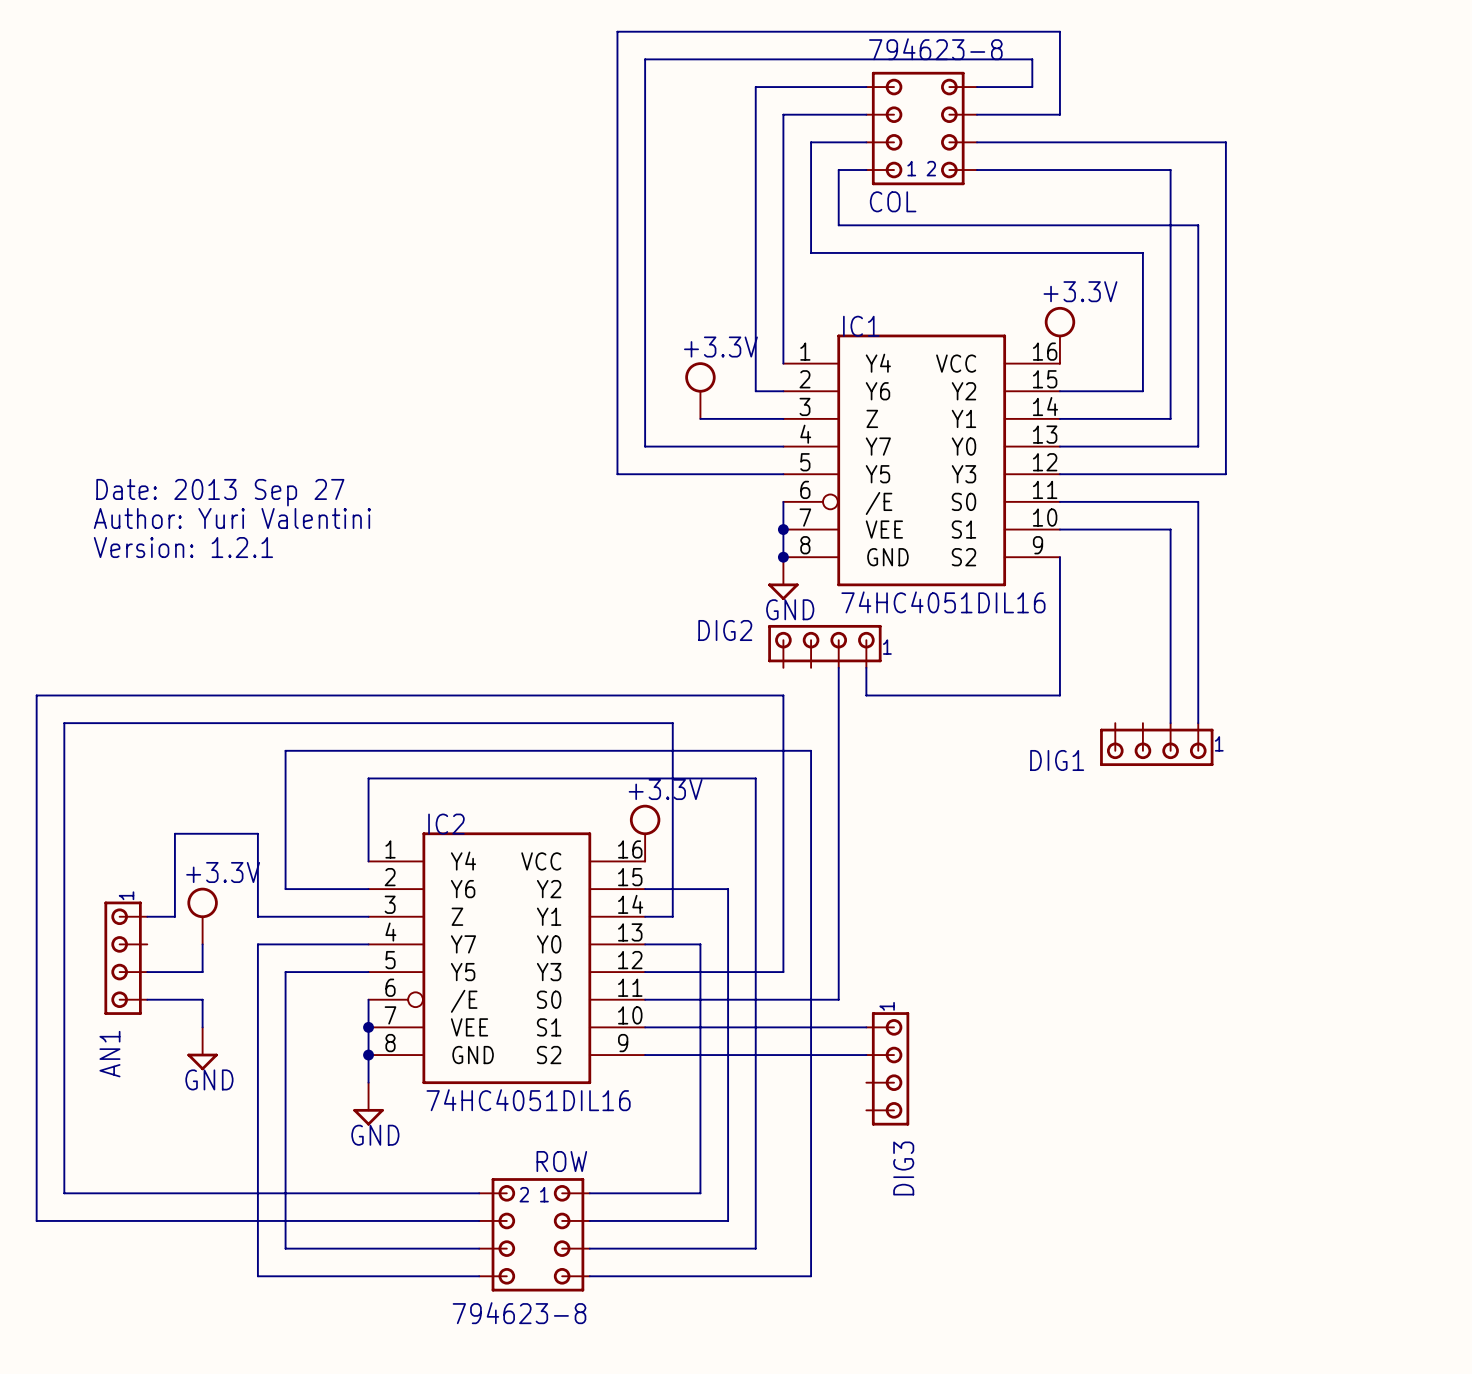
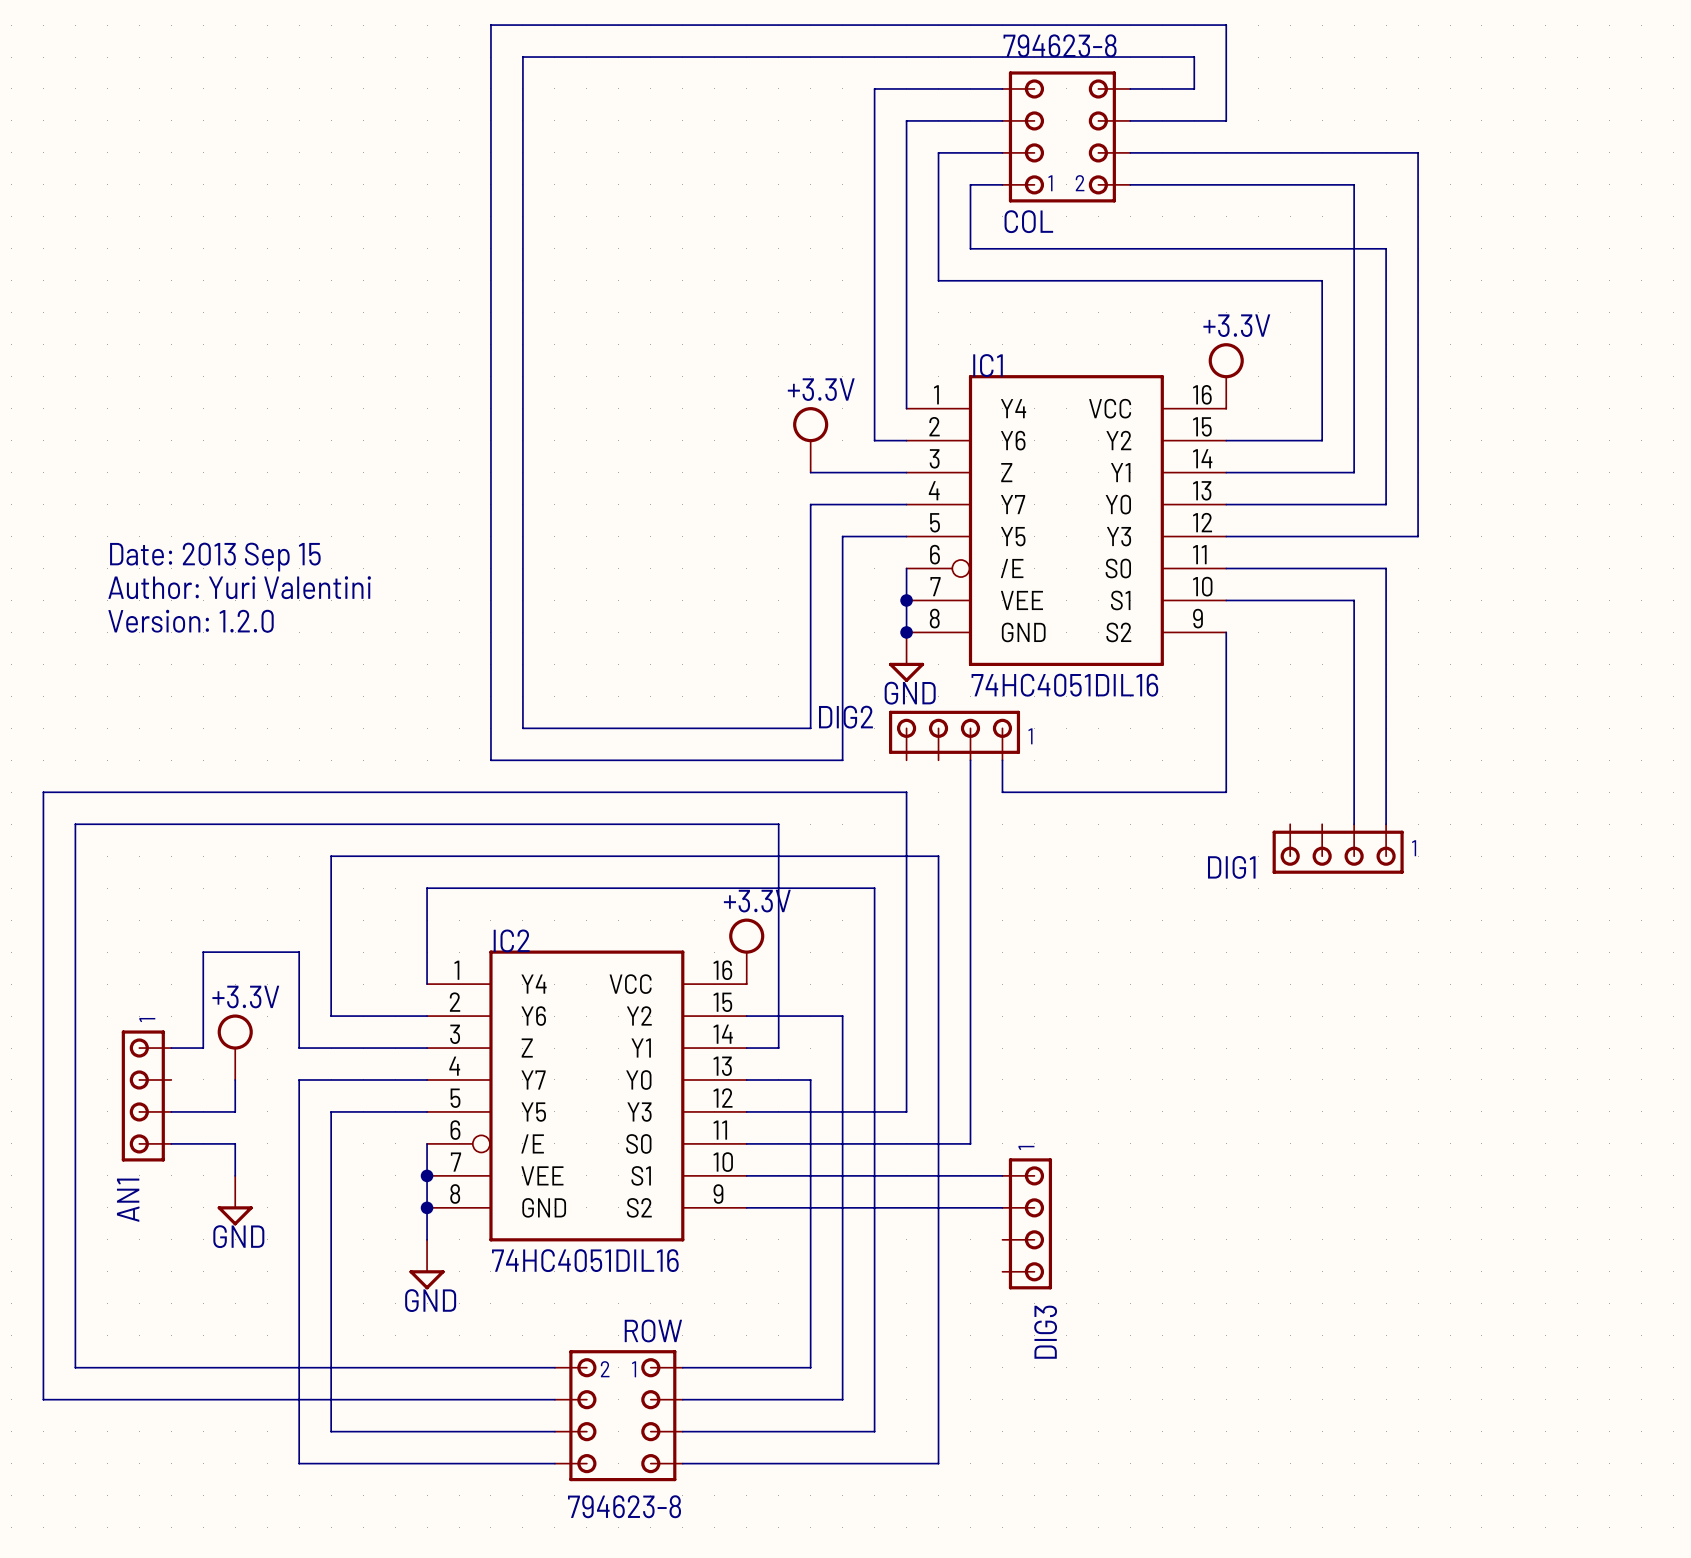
wire: (617, 31) (617, 474) (728, 474) -> (714, 25) (490, 25) (490, 760) (842, 760) (842, 536)
wire: (645, 59) (645, 446) (700, 446) -> (746, 57) (522, 57) (522, 728) (810, 728) (810, 504)
text: Date: 2013 Sep 27 (220, 492) -> Date: 2013 Sep 15 (215, 557)
text: Version: 1.2.1 (183, 547) -> Version: 1.2.0 (191, 621)

